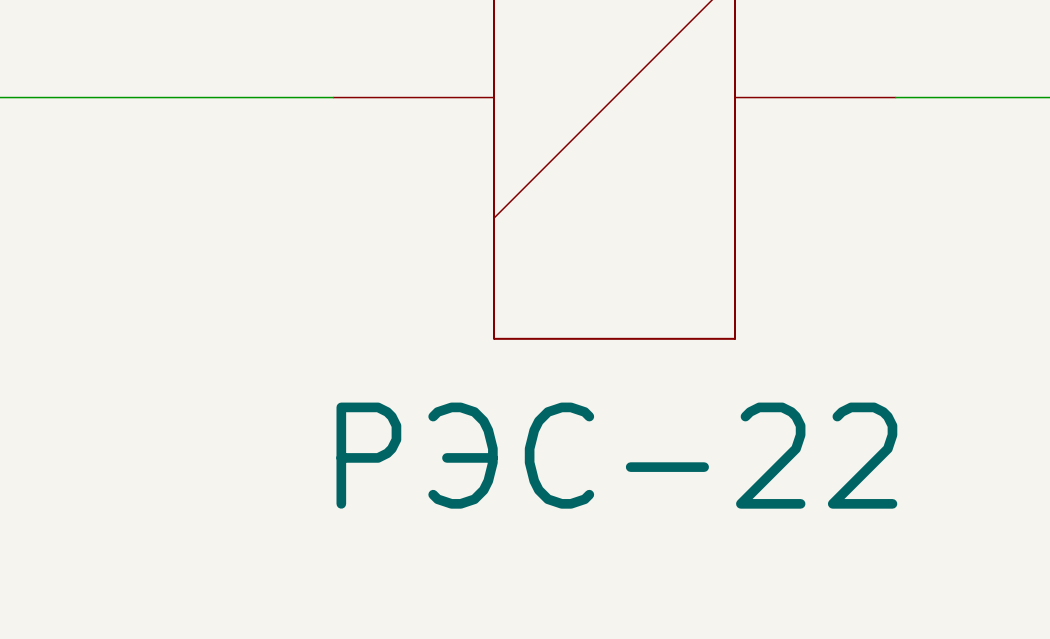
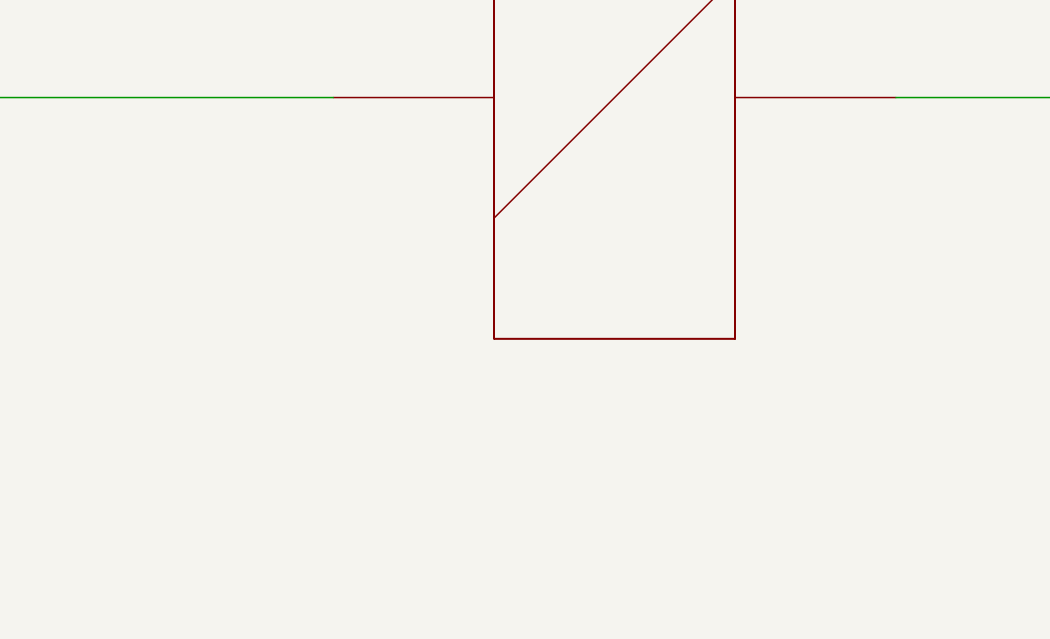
part value: РЭС-22 (616, 455) -> none

